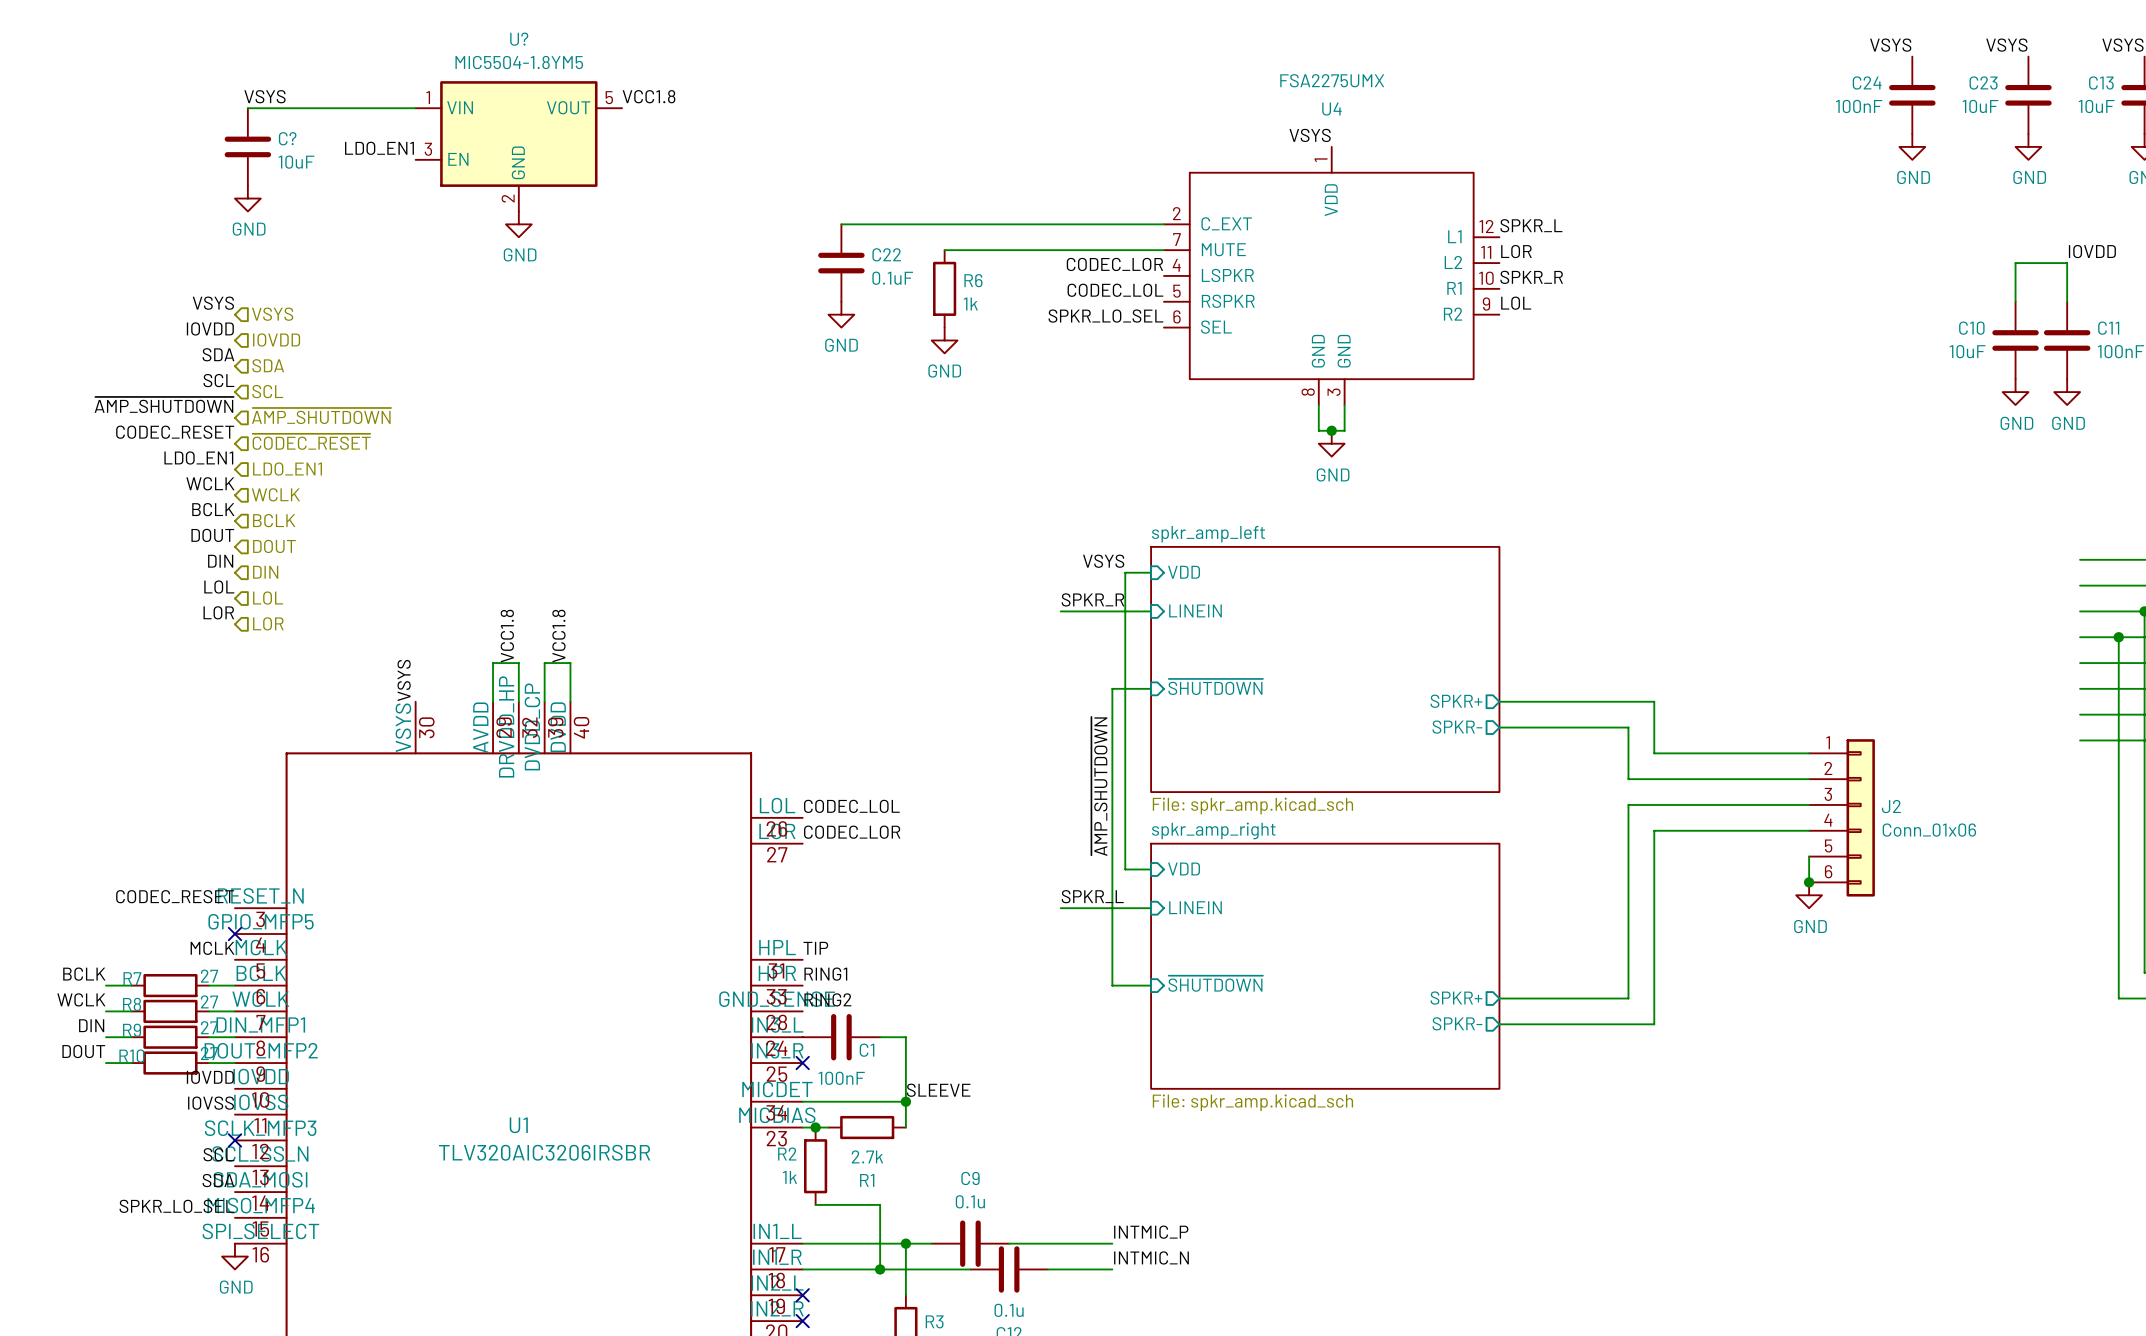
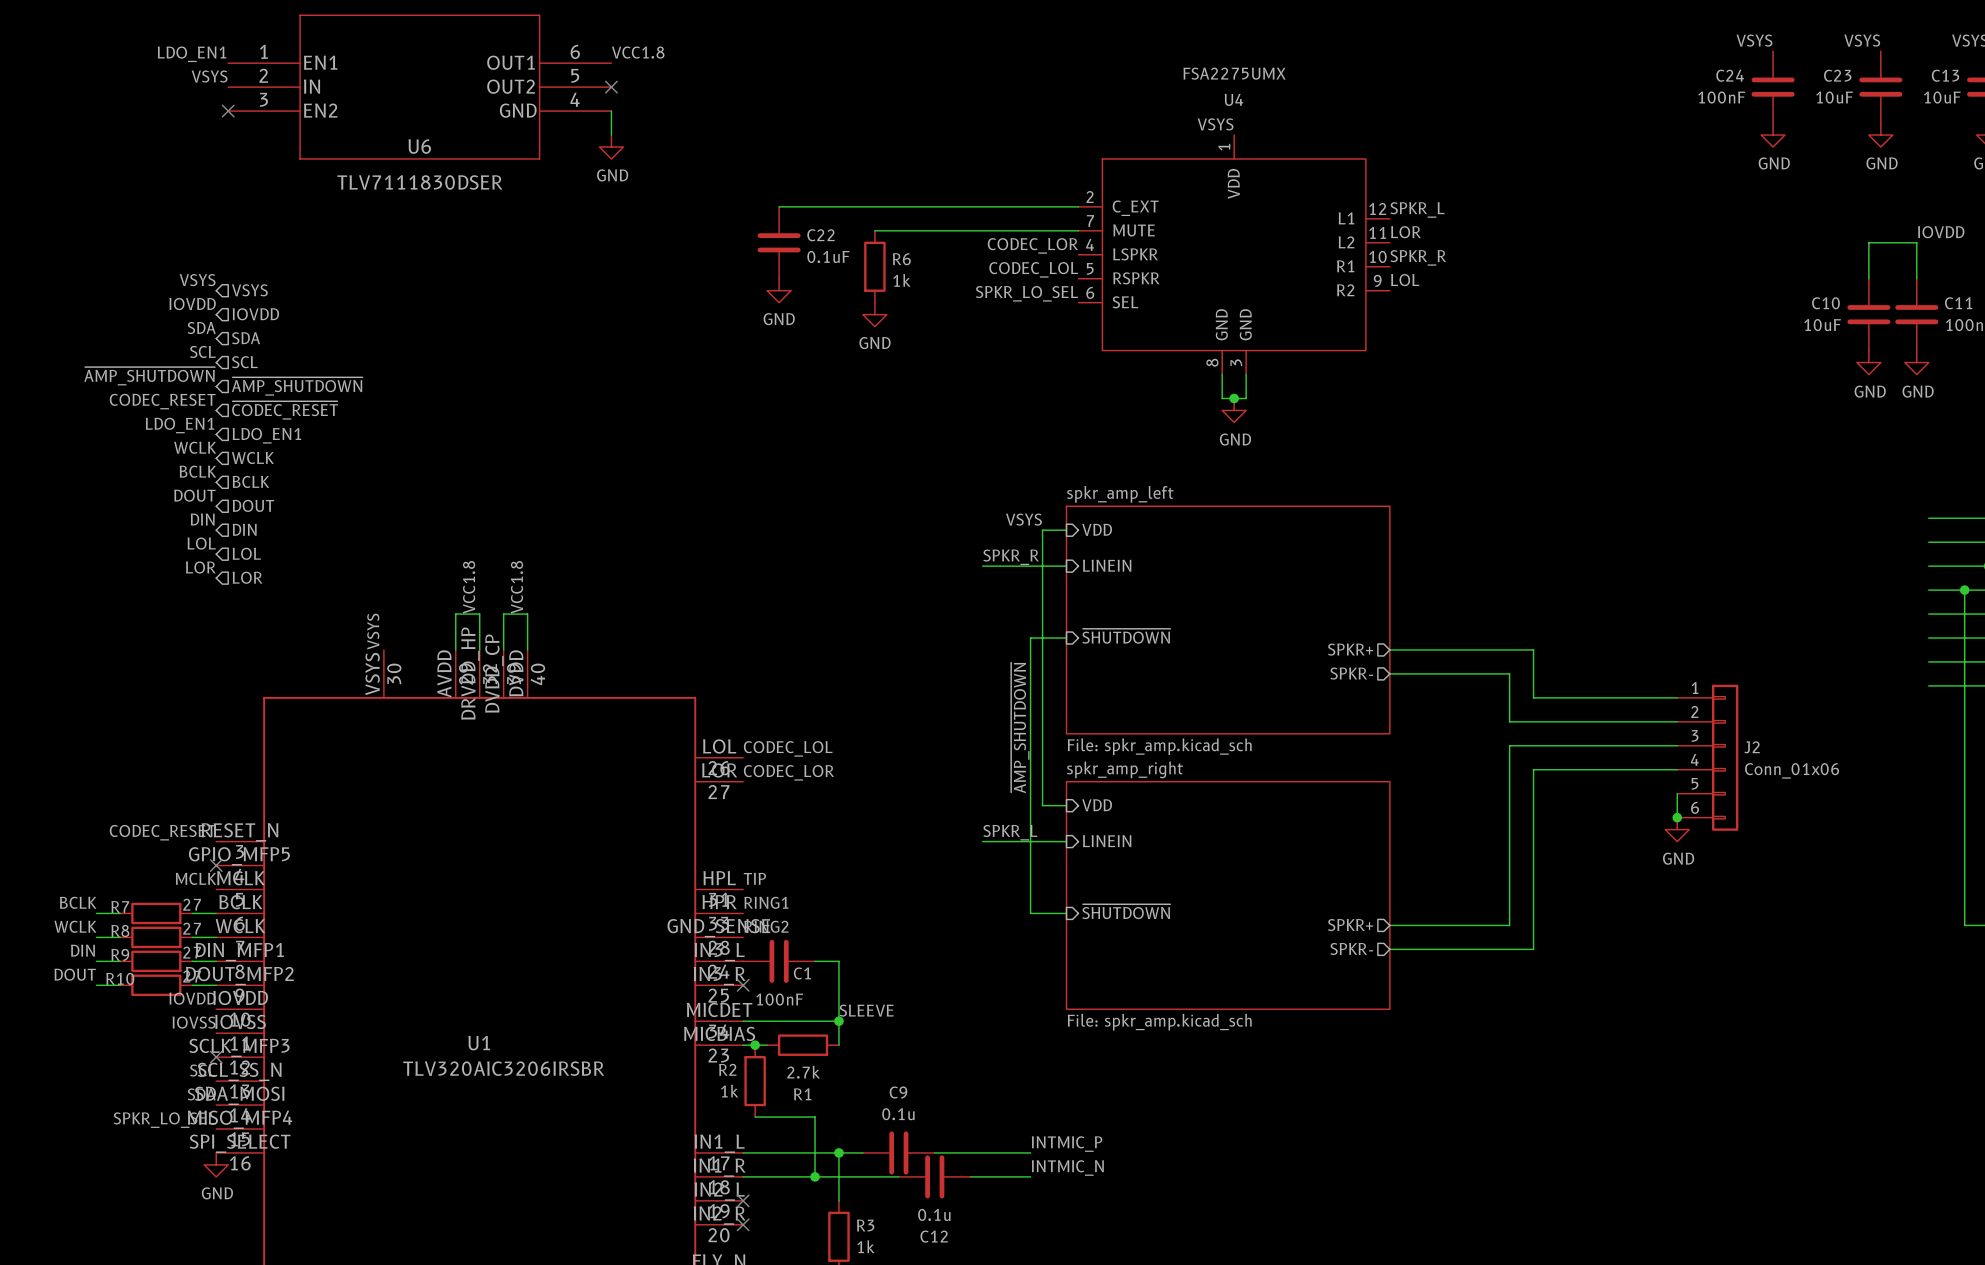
U6: none -> TLV7111830DSER (419, 87)
no-connect mark: none -> (611, 87)
label position: VSYS (265, 96) -> VSYS (209, 76)
label position: VCC1.8 (649, 96) -> VCC1.8 (638, 52)
wire: (247, 108) (415, 108) -> none
no-connect mark: none -> (228, 111)
wire: none -> (611, 111) (611, 135)
C?: 10uF (247, 146) -> none
U?: MIC5504-1.8YM5 (518, 146) -> none
label position: LDO_EN1 (379, 148) -> LDO_EN1 (192, 54)
power symbol: GND (247, 198) -> none
power symbol position: GND (518, 224) -> GND (611, 147)

